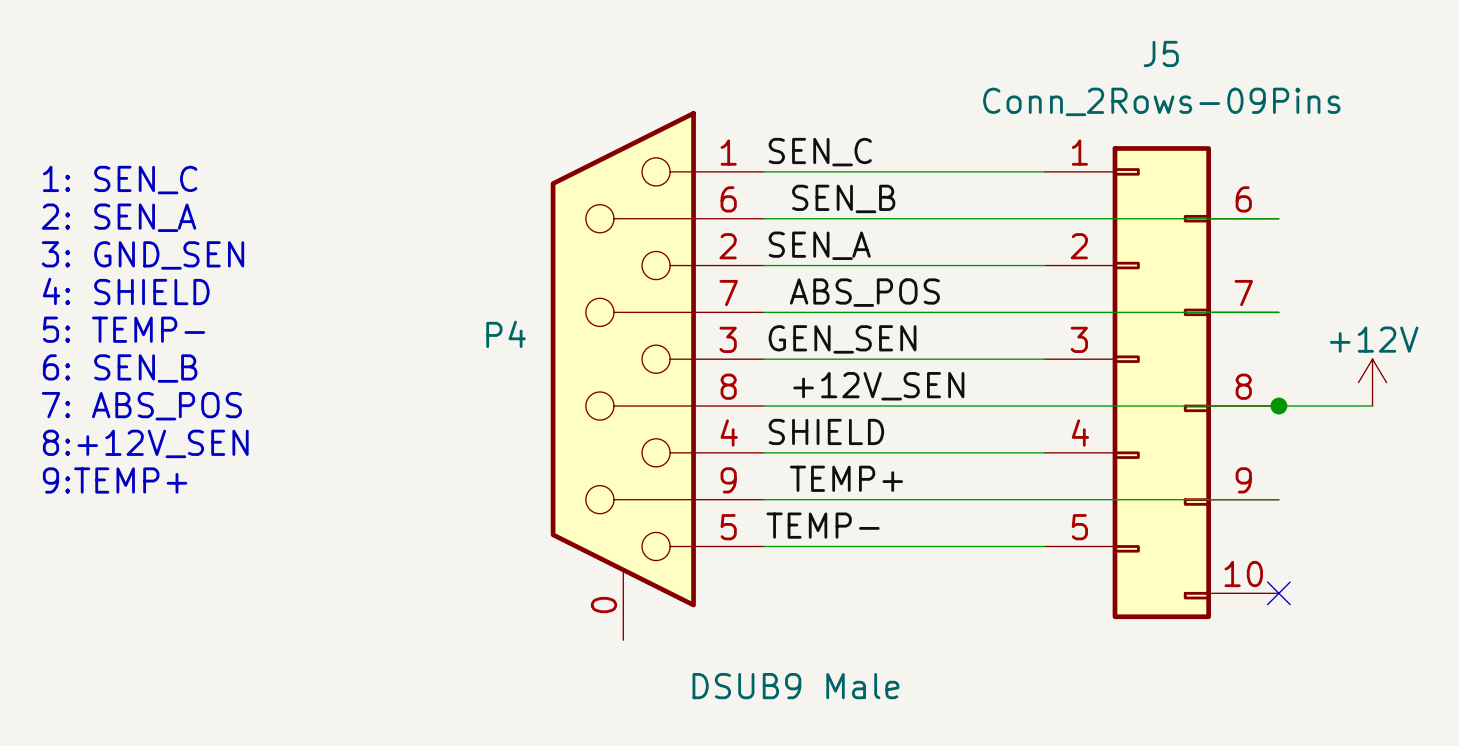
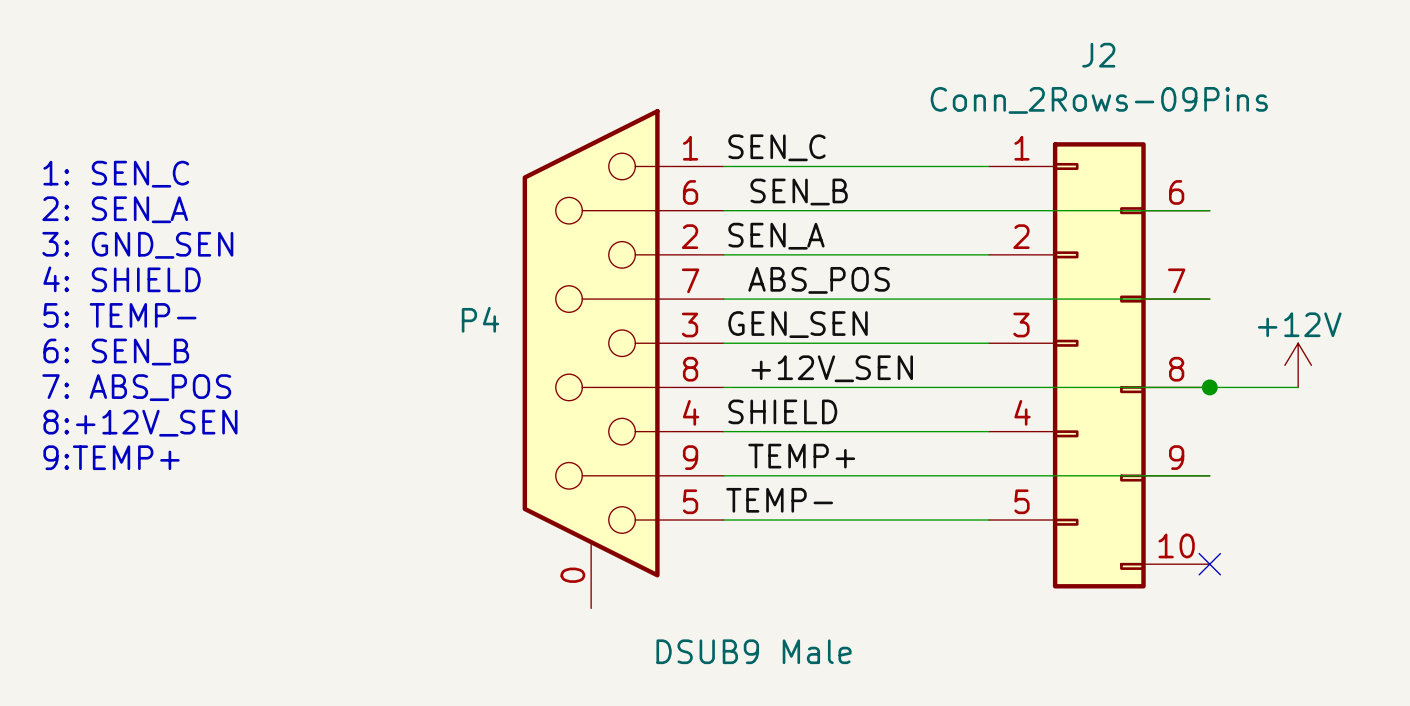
J5 name: J5 (1161, 53) -> J2 (1098, 55)

